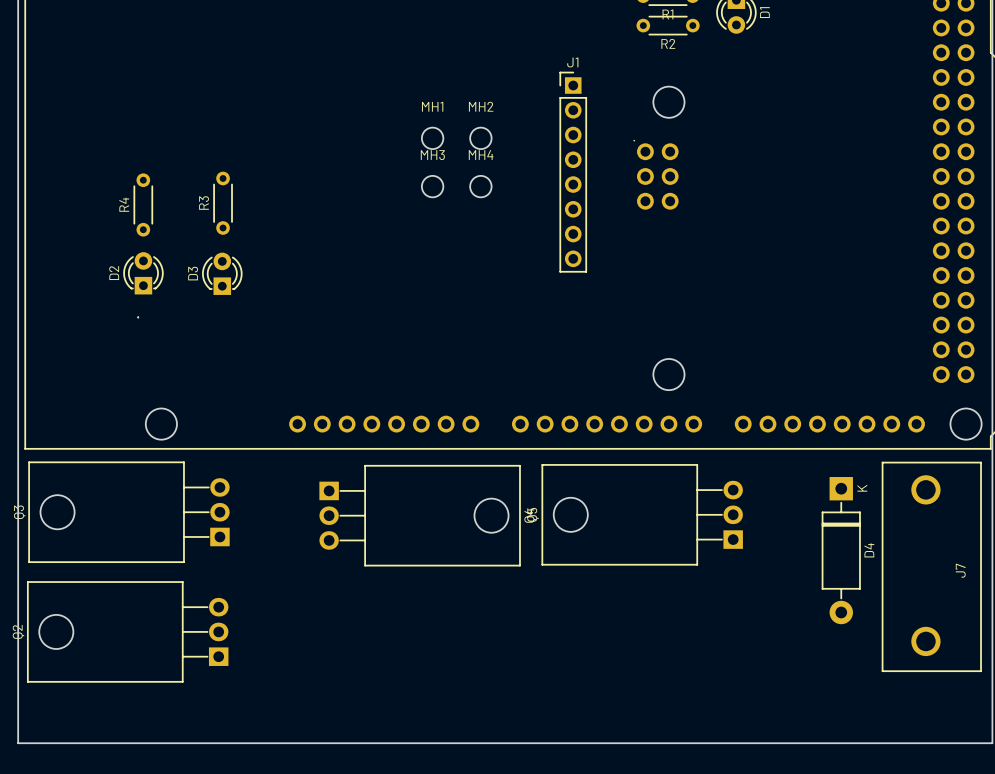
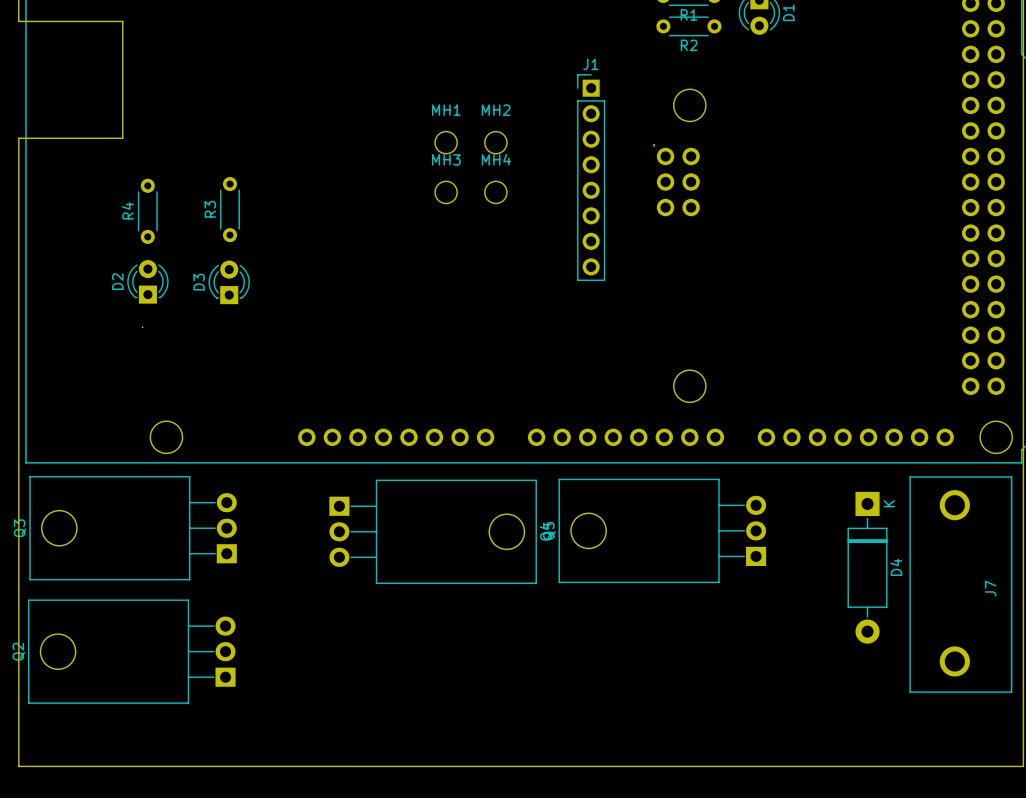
board edge: (18, 20) (18, 743) -> (18, 21) (122, 21) (122, 138) (18, 138) (18, 766)

